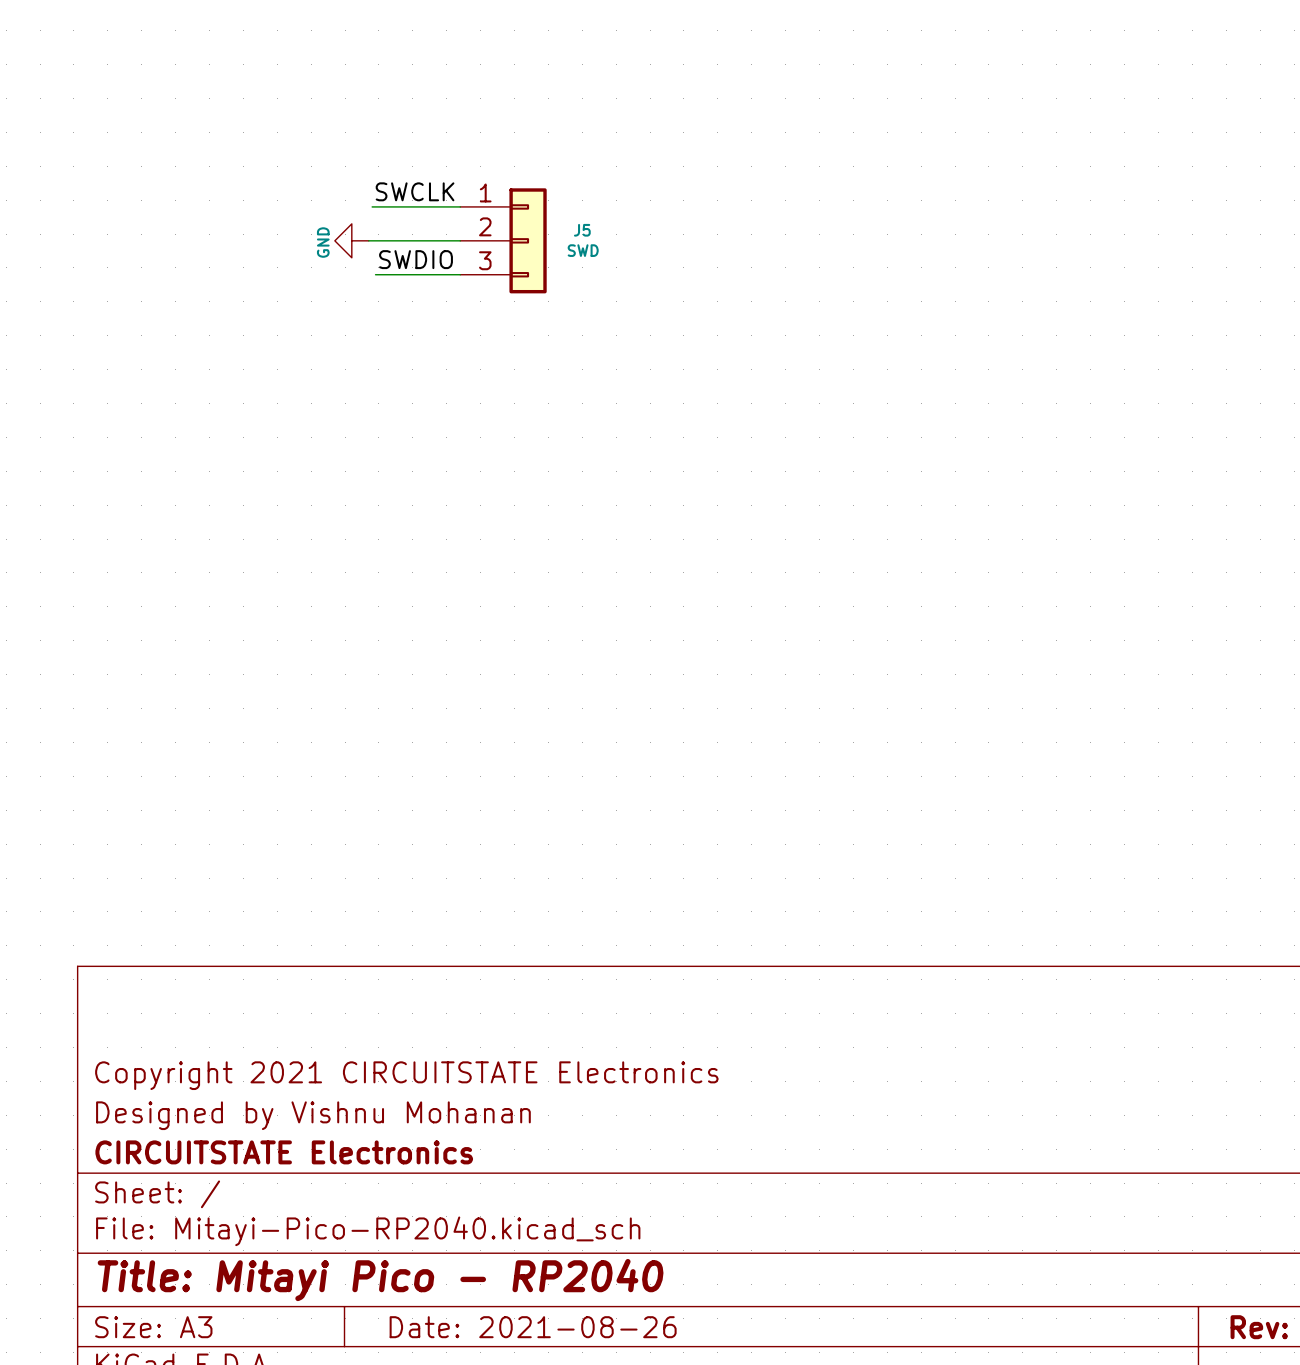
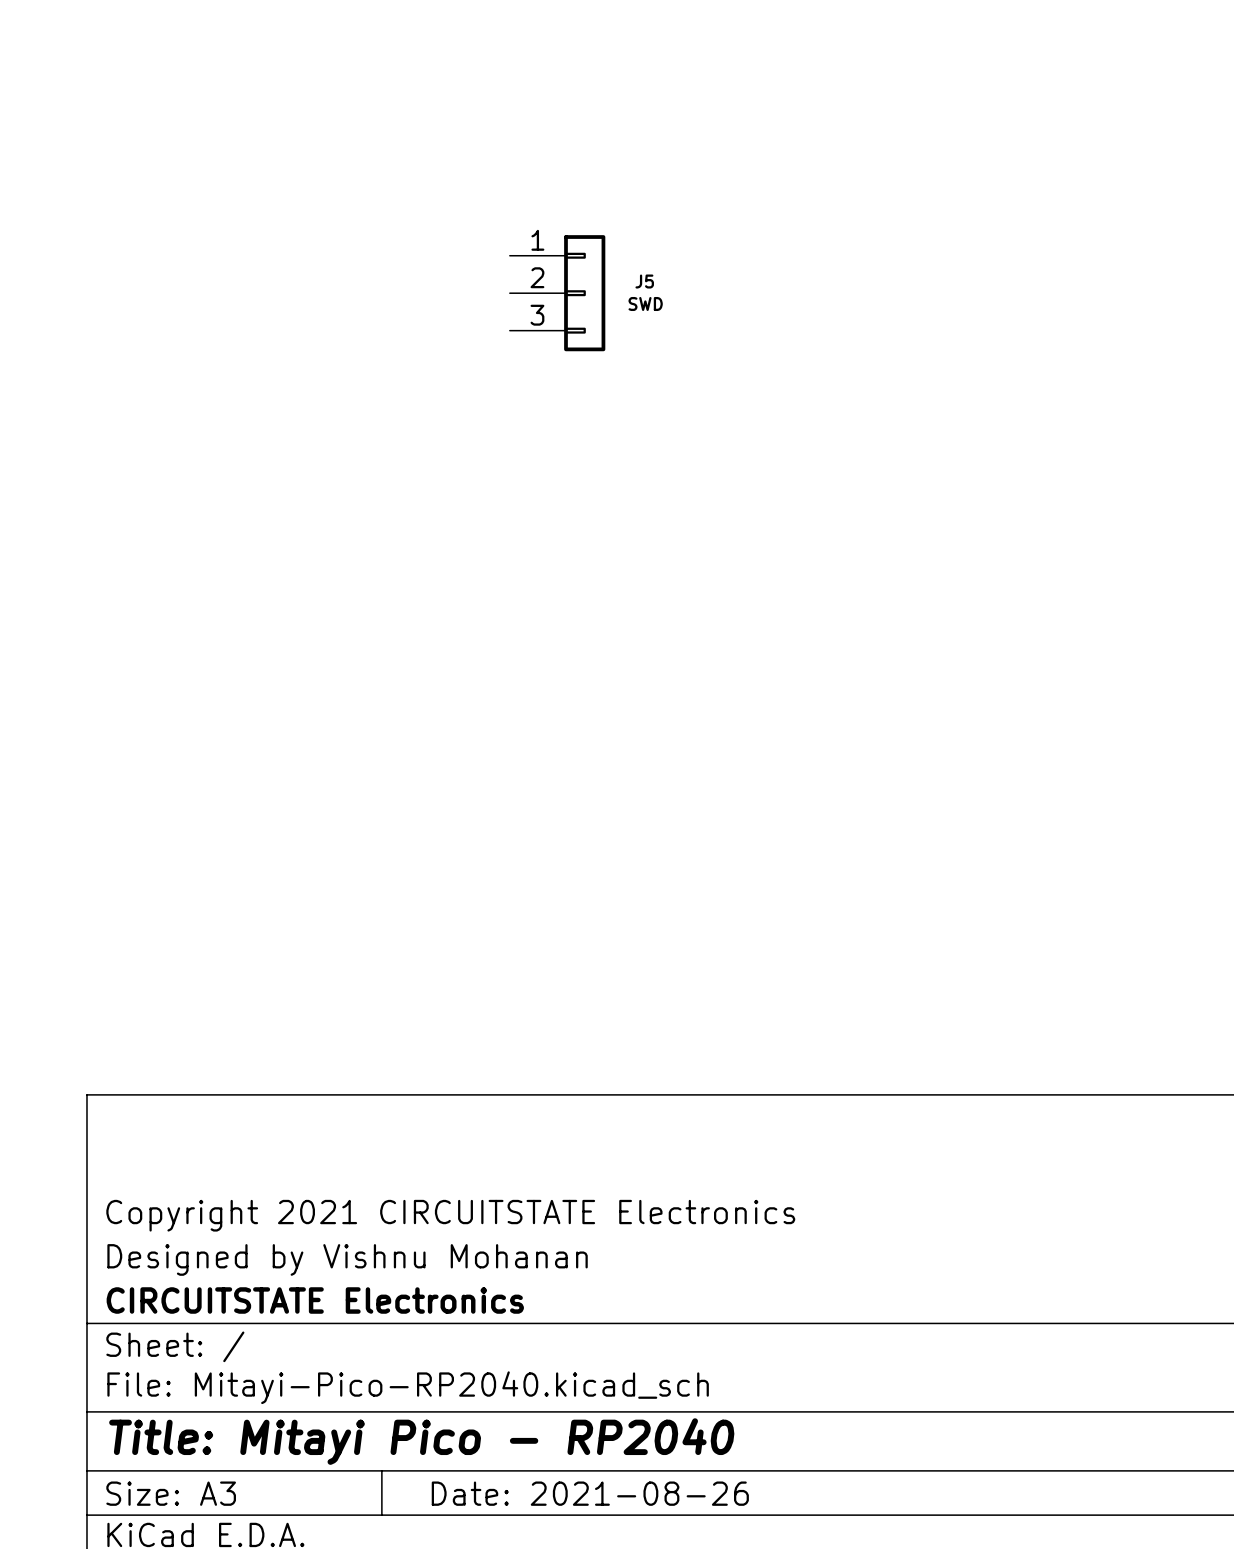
label: SWCLK (415, 191) -> none
wire: (372, 206) (460, 206) -> none
power symbol: GND (351, 240) -> none
wire: (368, 240) (460, 240) -> none
label: SWDIO (416, 259) -> none
wire: (375, 274) (460, 274) -> none

